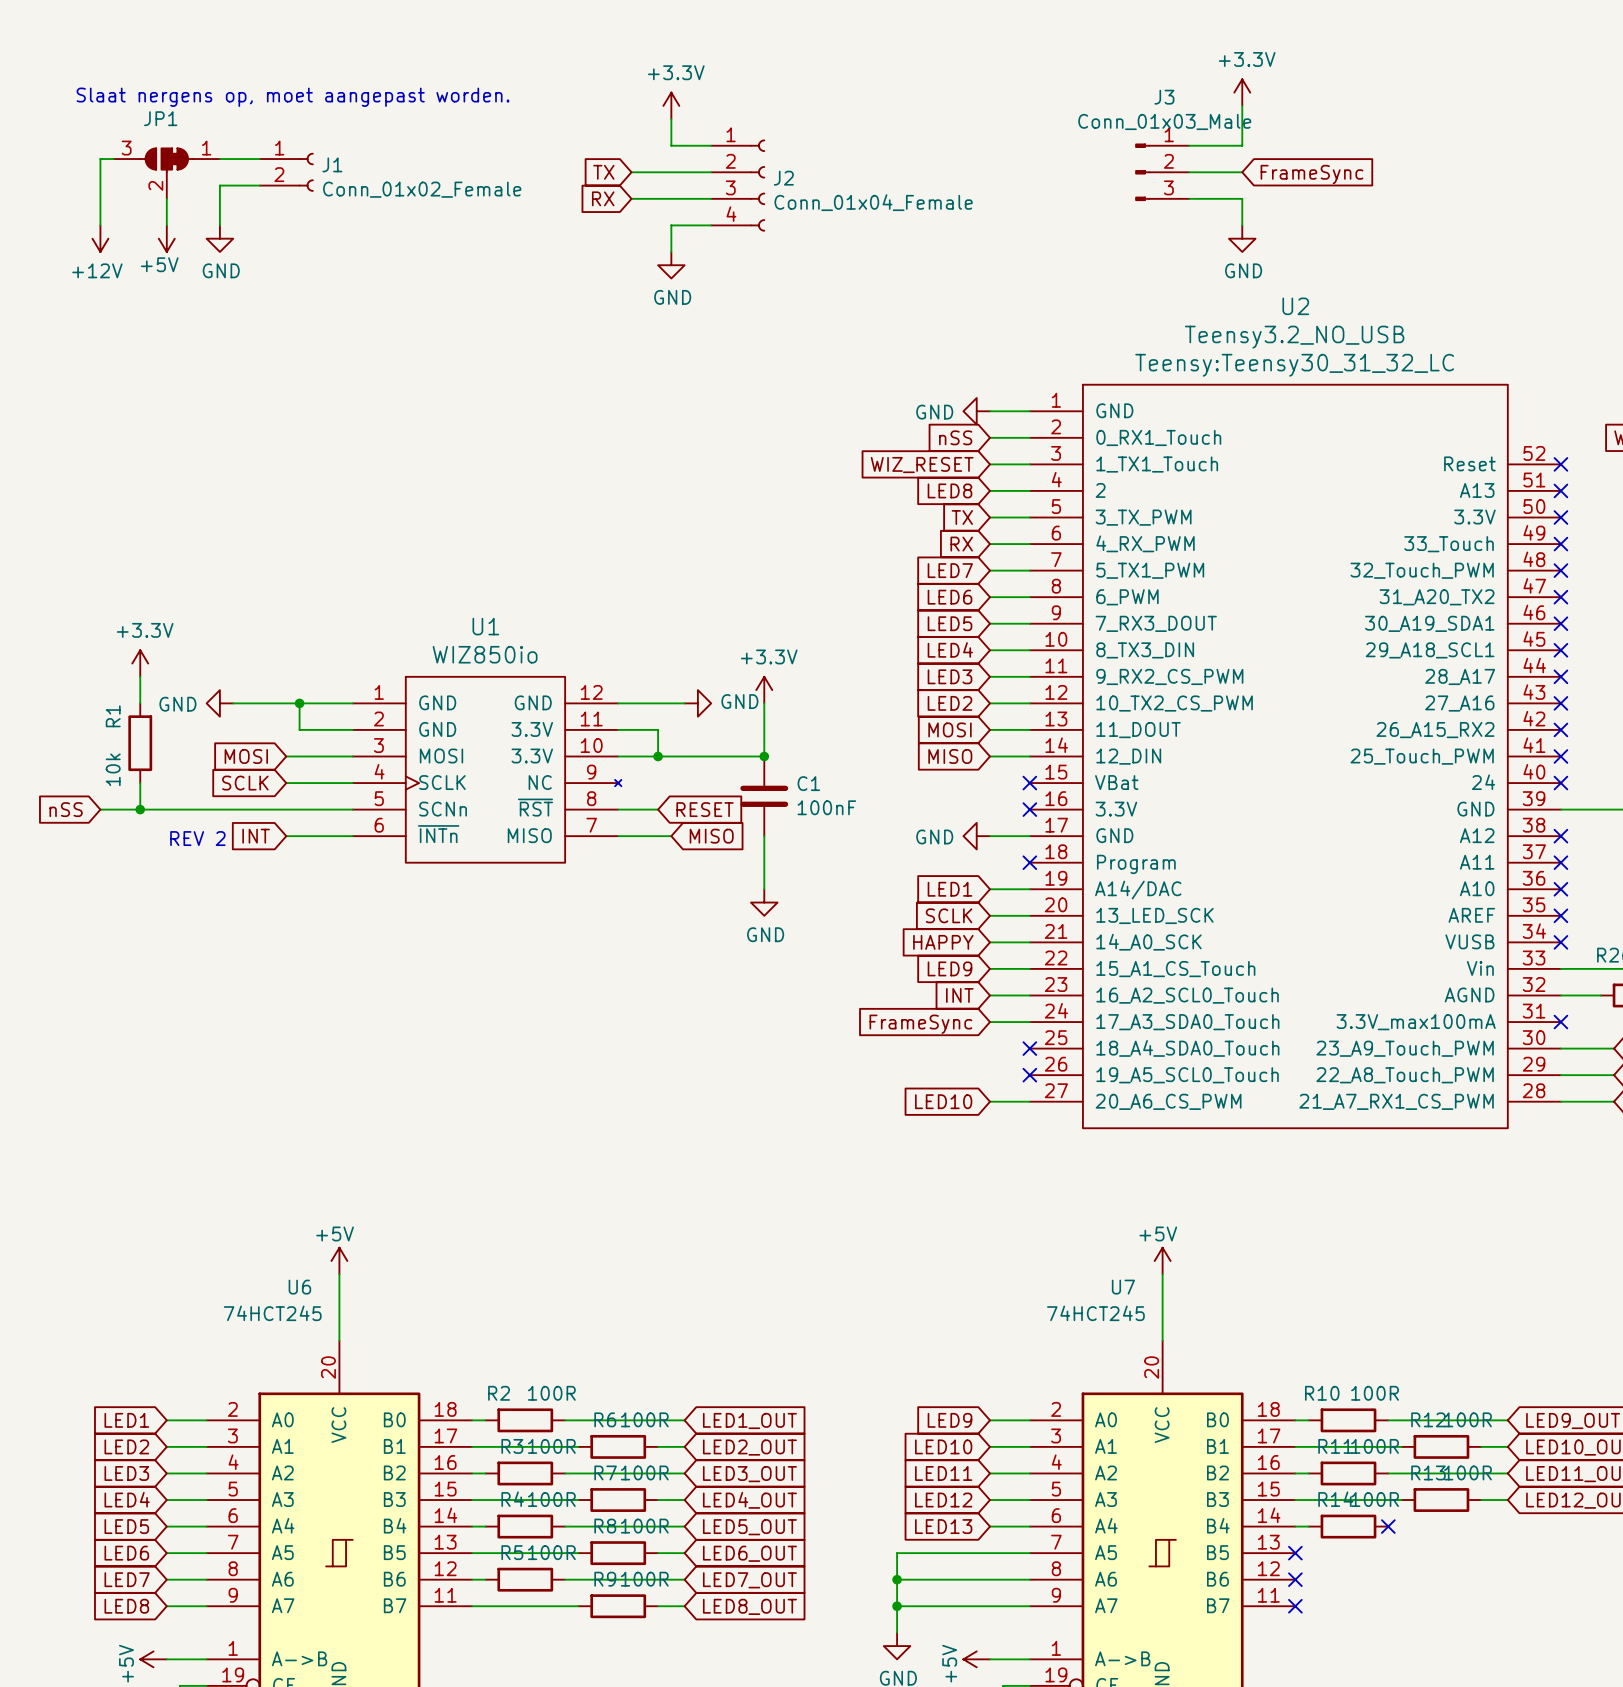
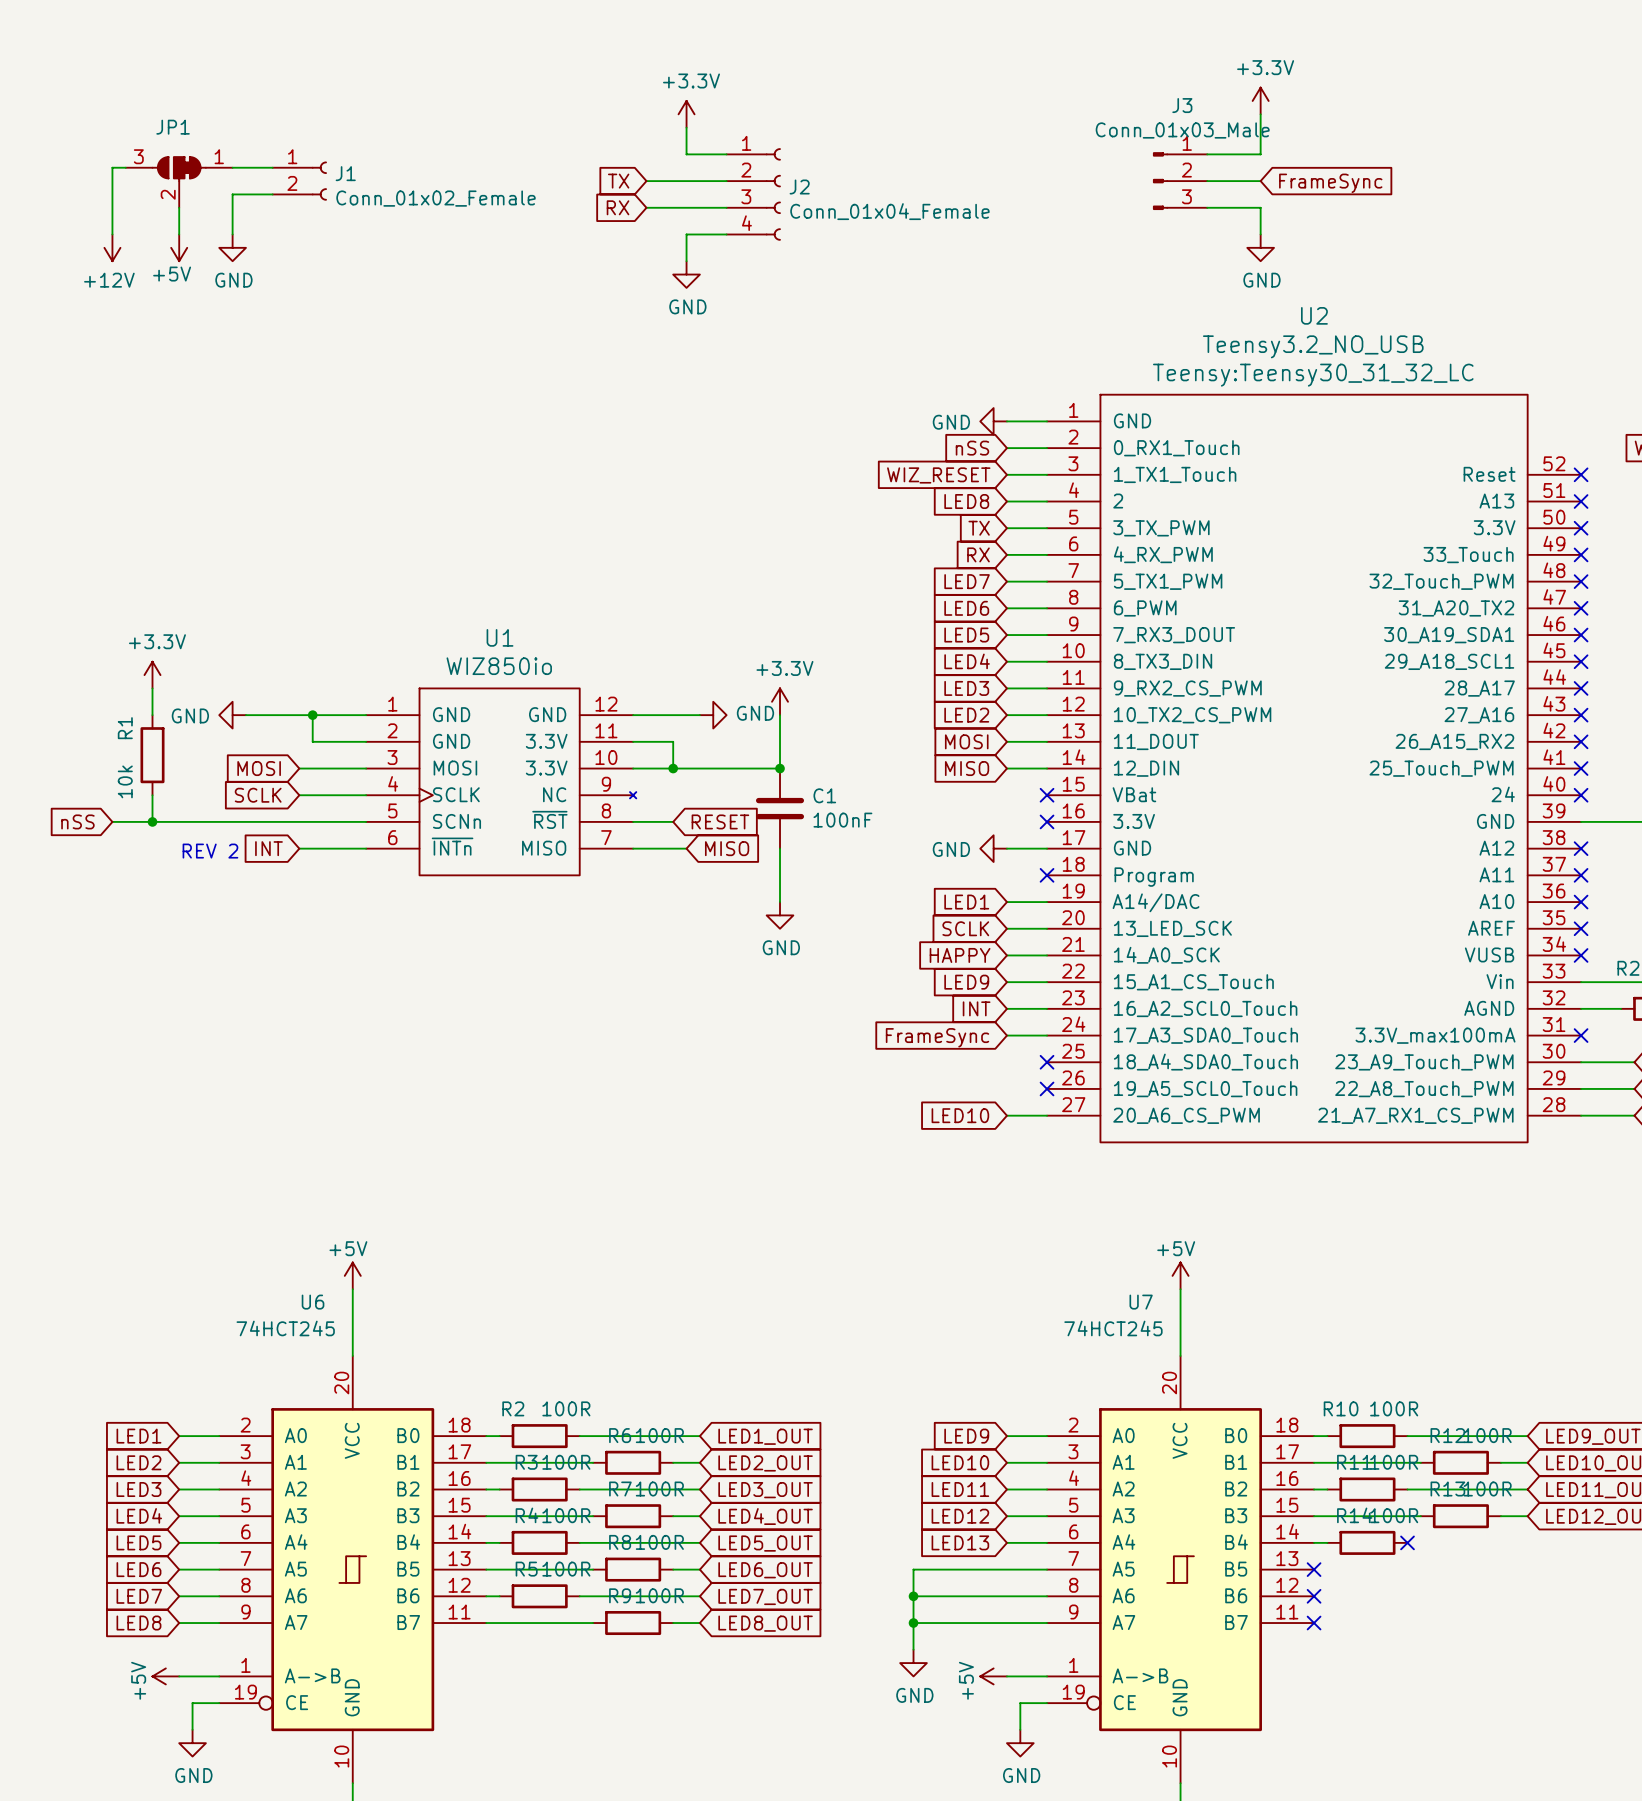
text: Slaat nergens op, moet aangepast worden. (293, 97) -> none

